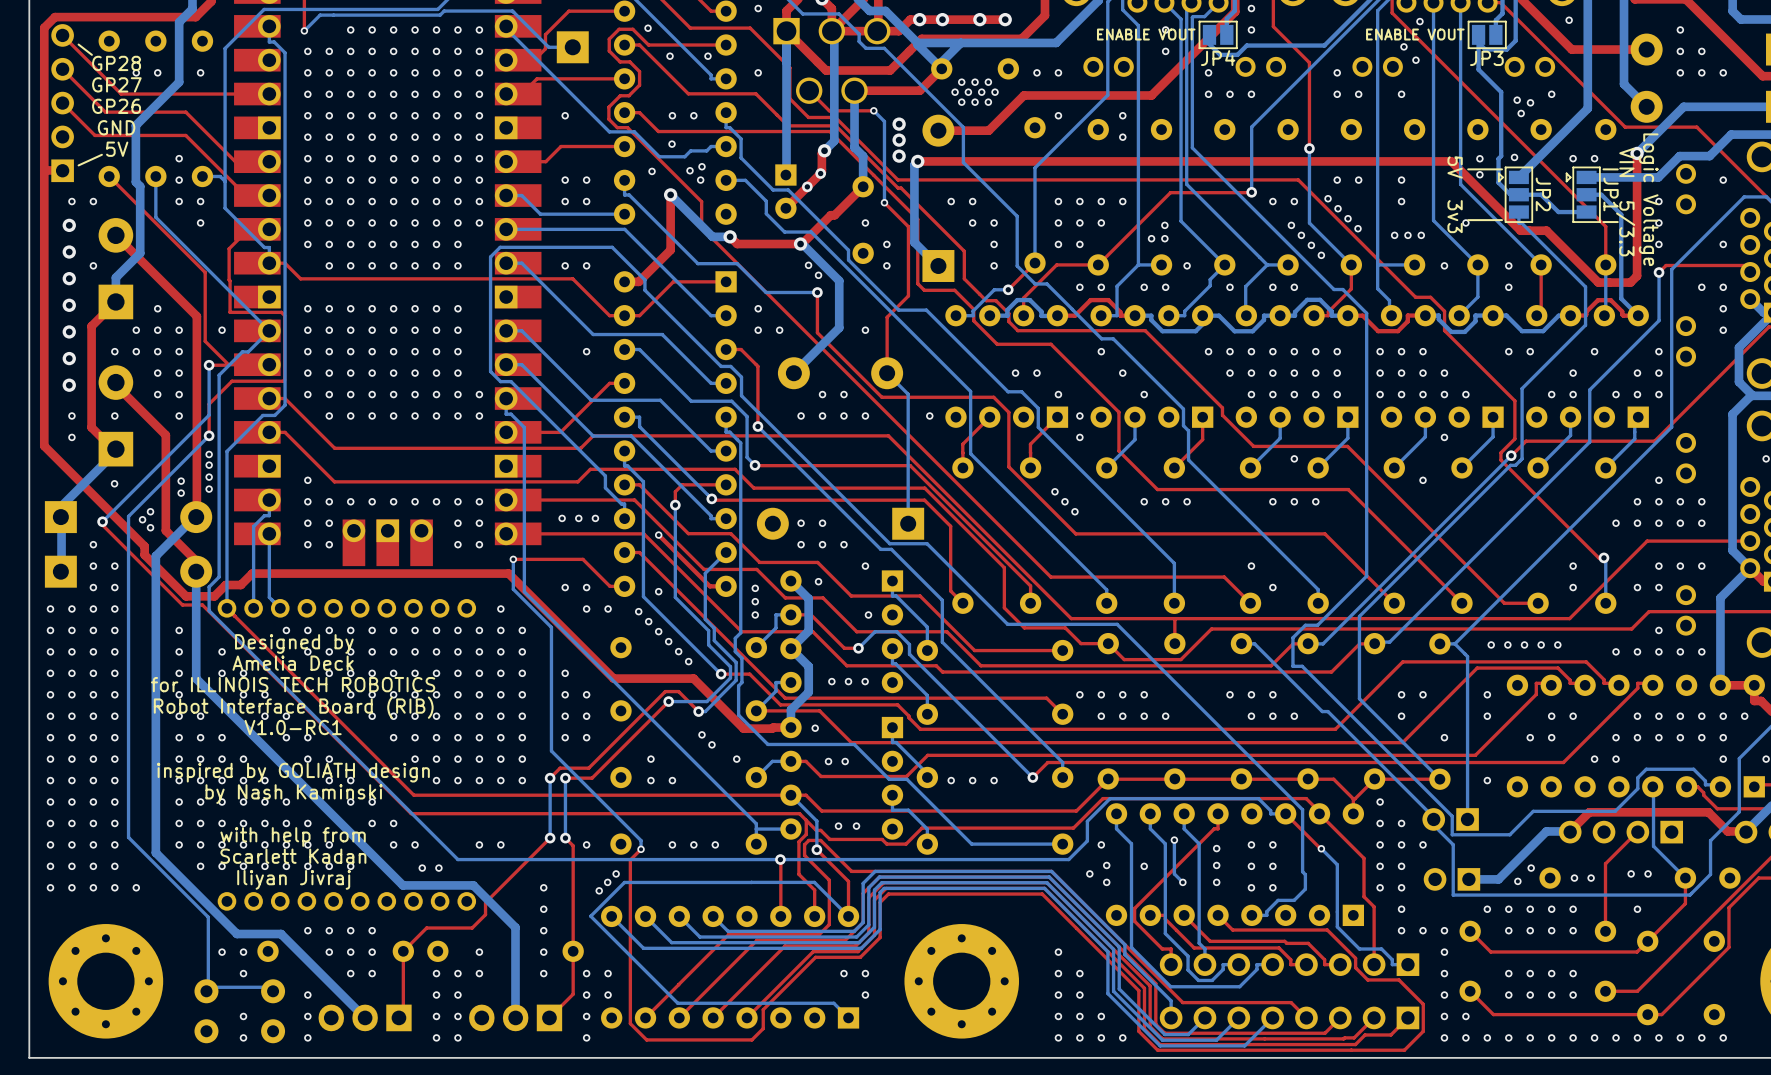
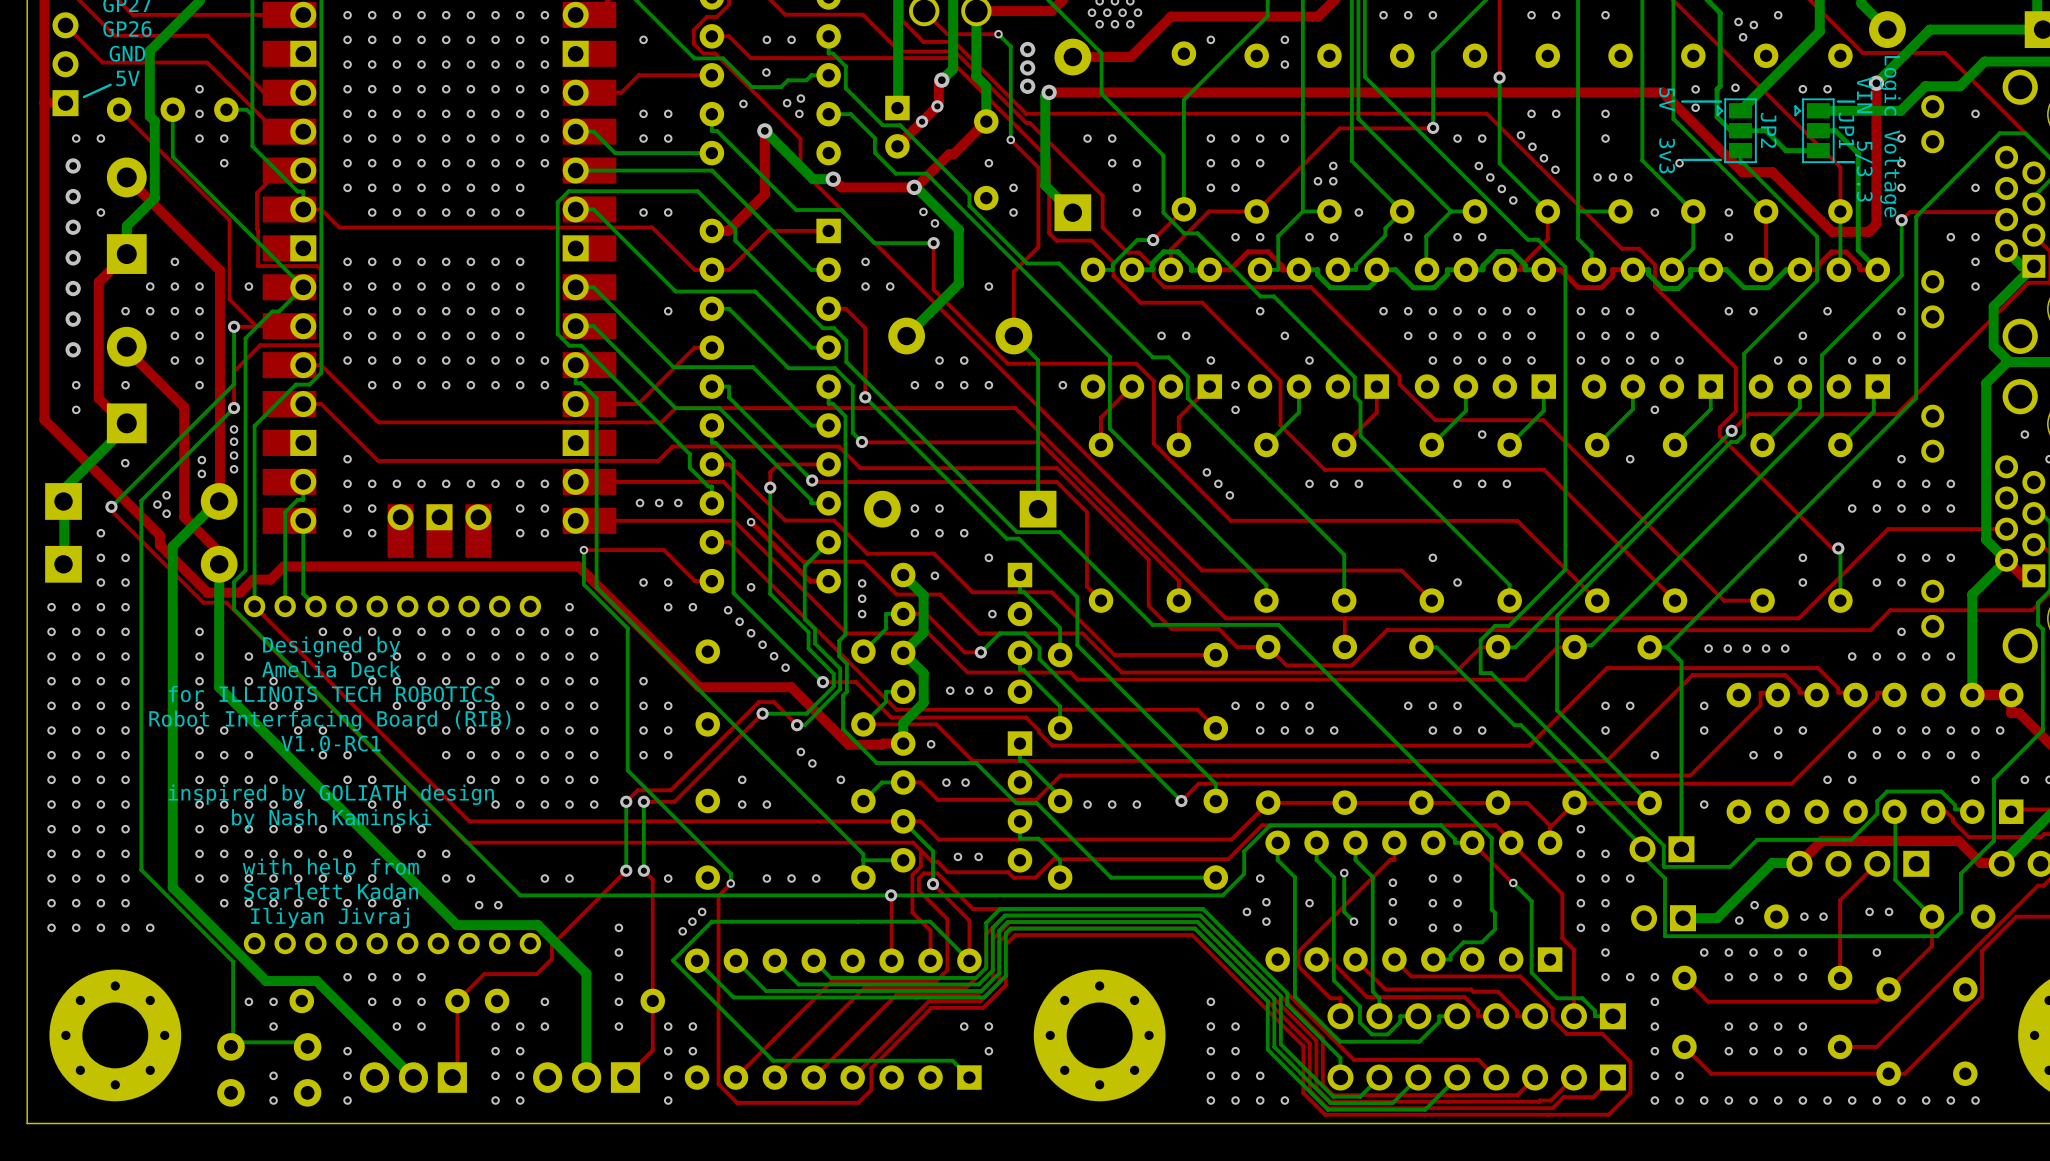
text: Robot Interface Board (RIB) (293, 707) -> Robot Interfacing Board (RIB) (329, 720)

